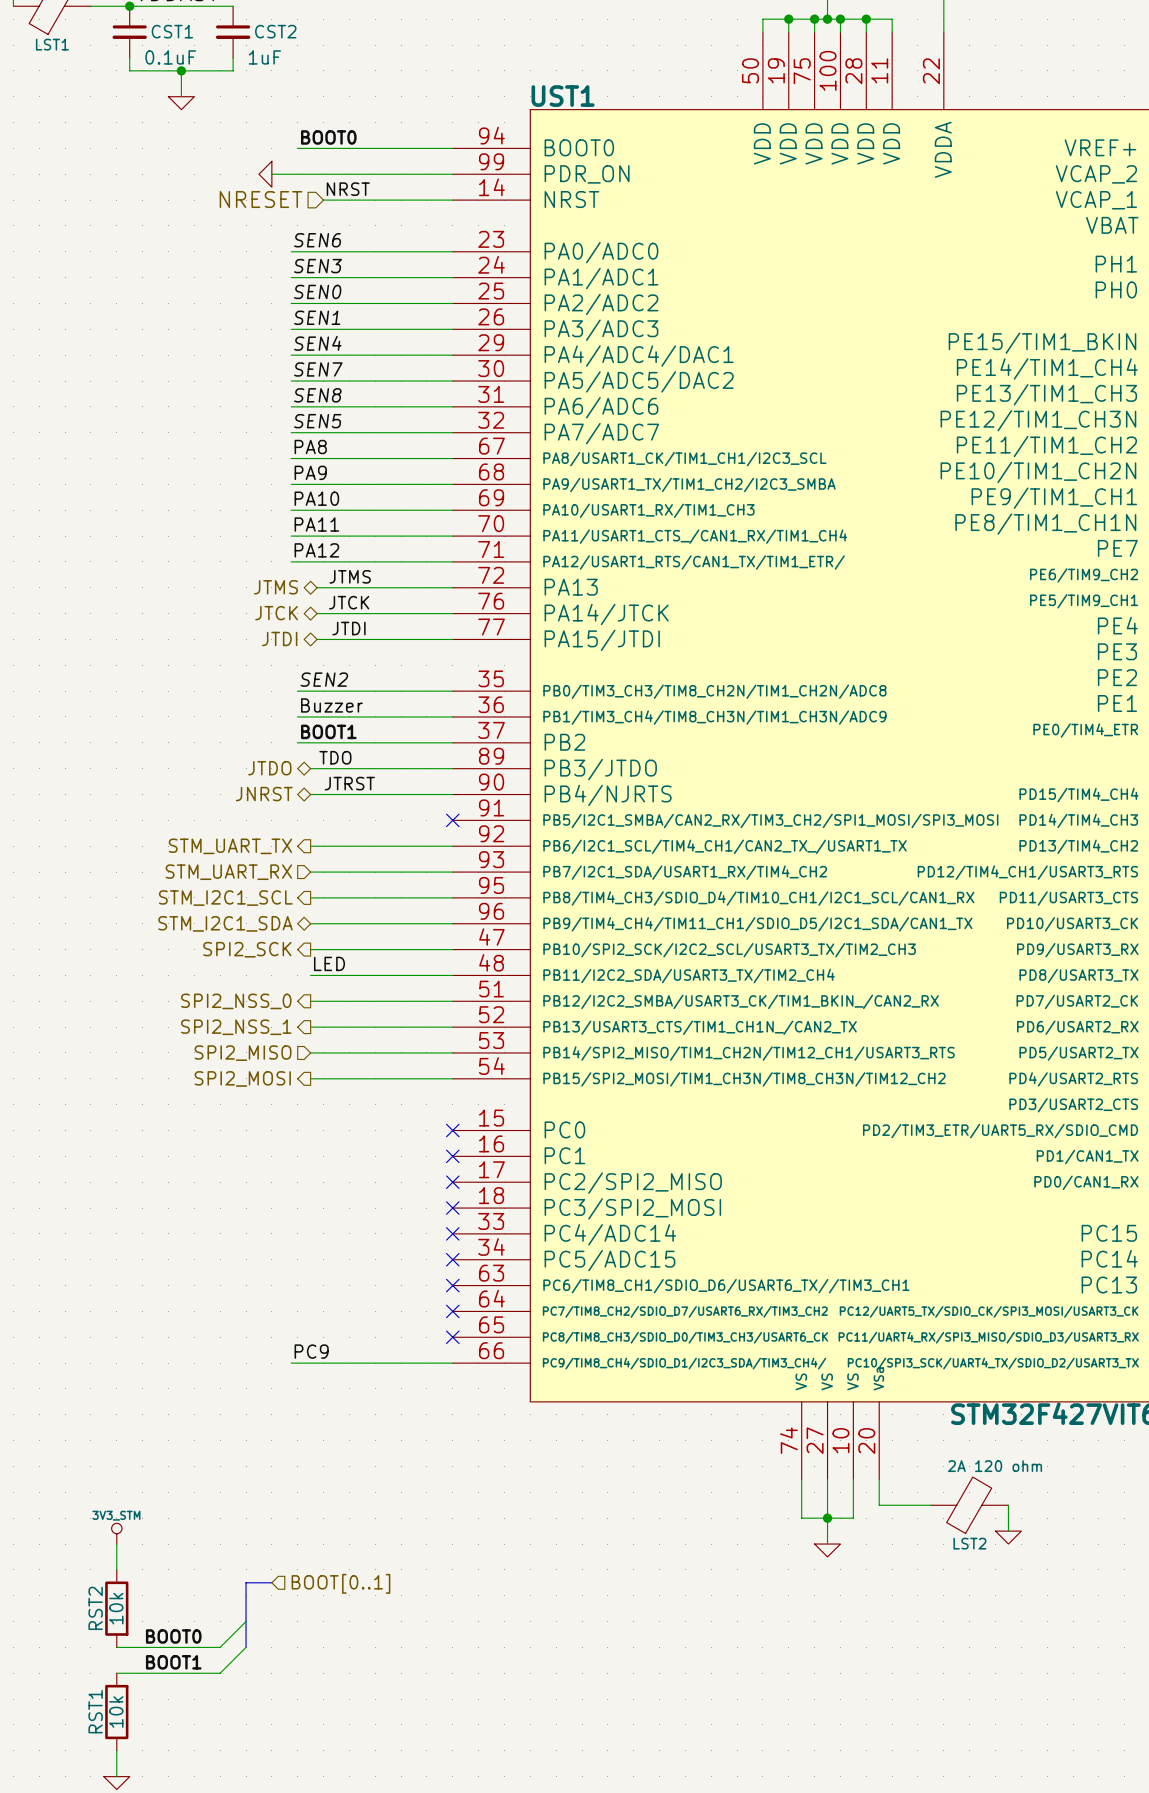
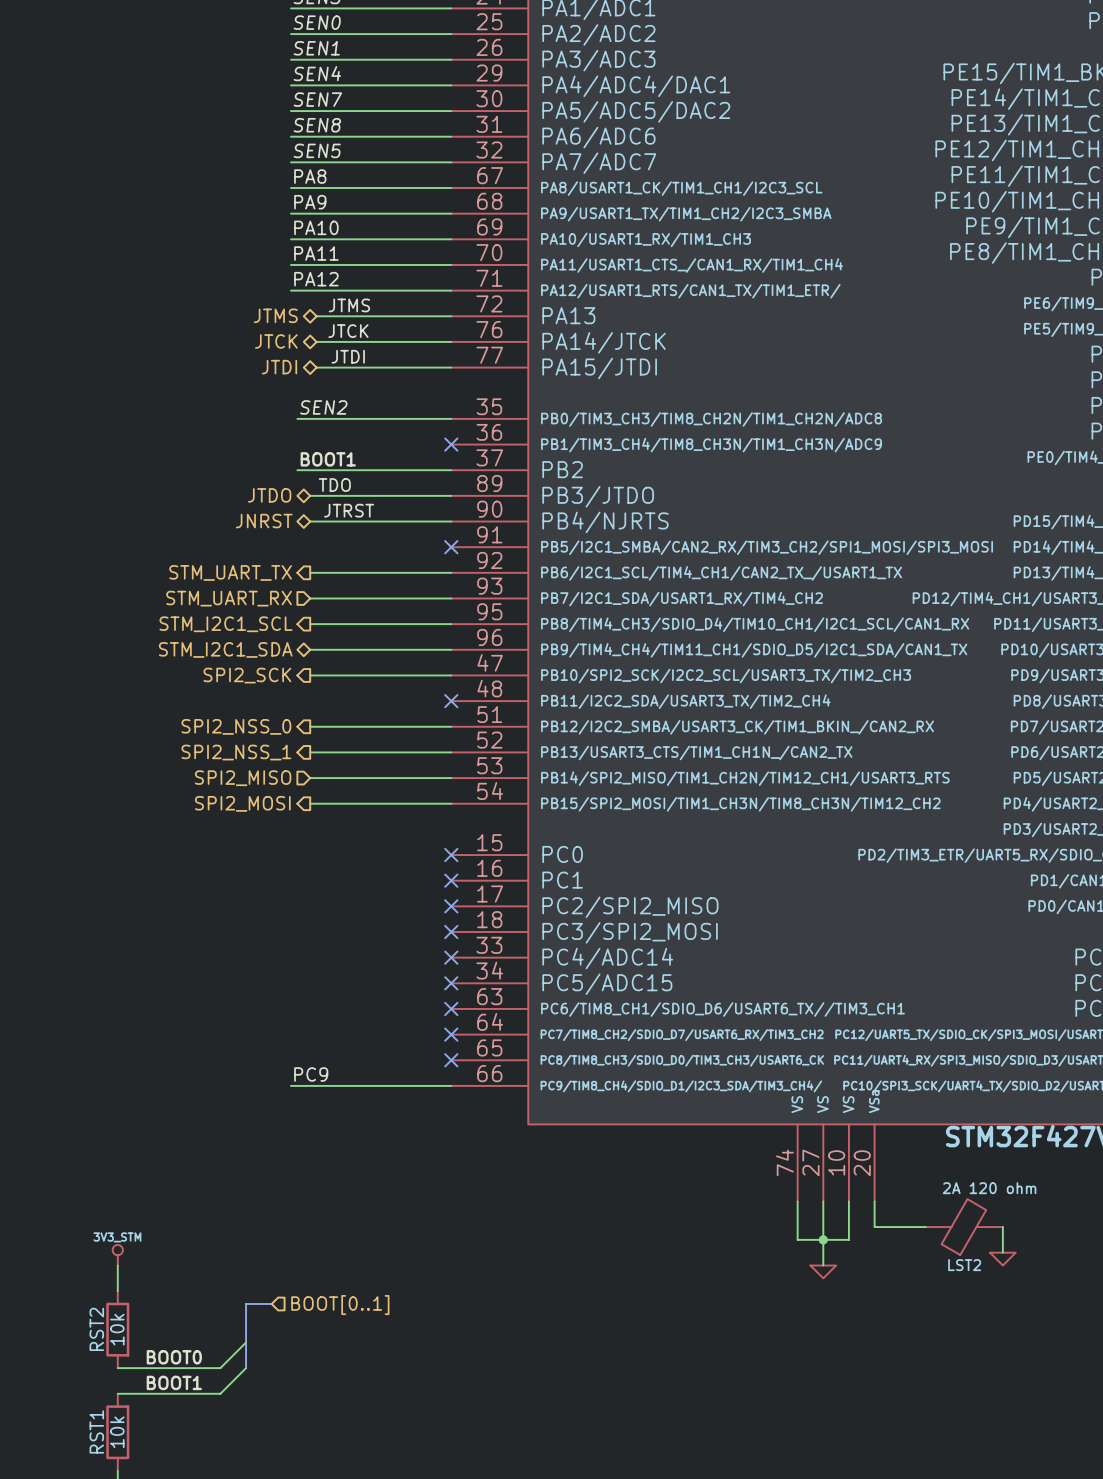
label: Buzzer (331, 705) -> none
wire: (297, 716) (452, 716) -> none
no-connect mark: none -> (451, 444)
label: LED (329, 963) -> none
wire: (310, 975) (452, 975) -> none
no-connect mark: none -> (451, 701)

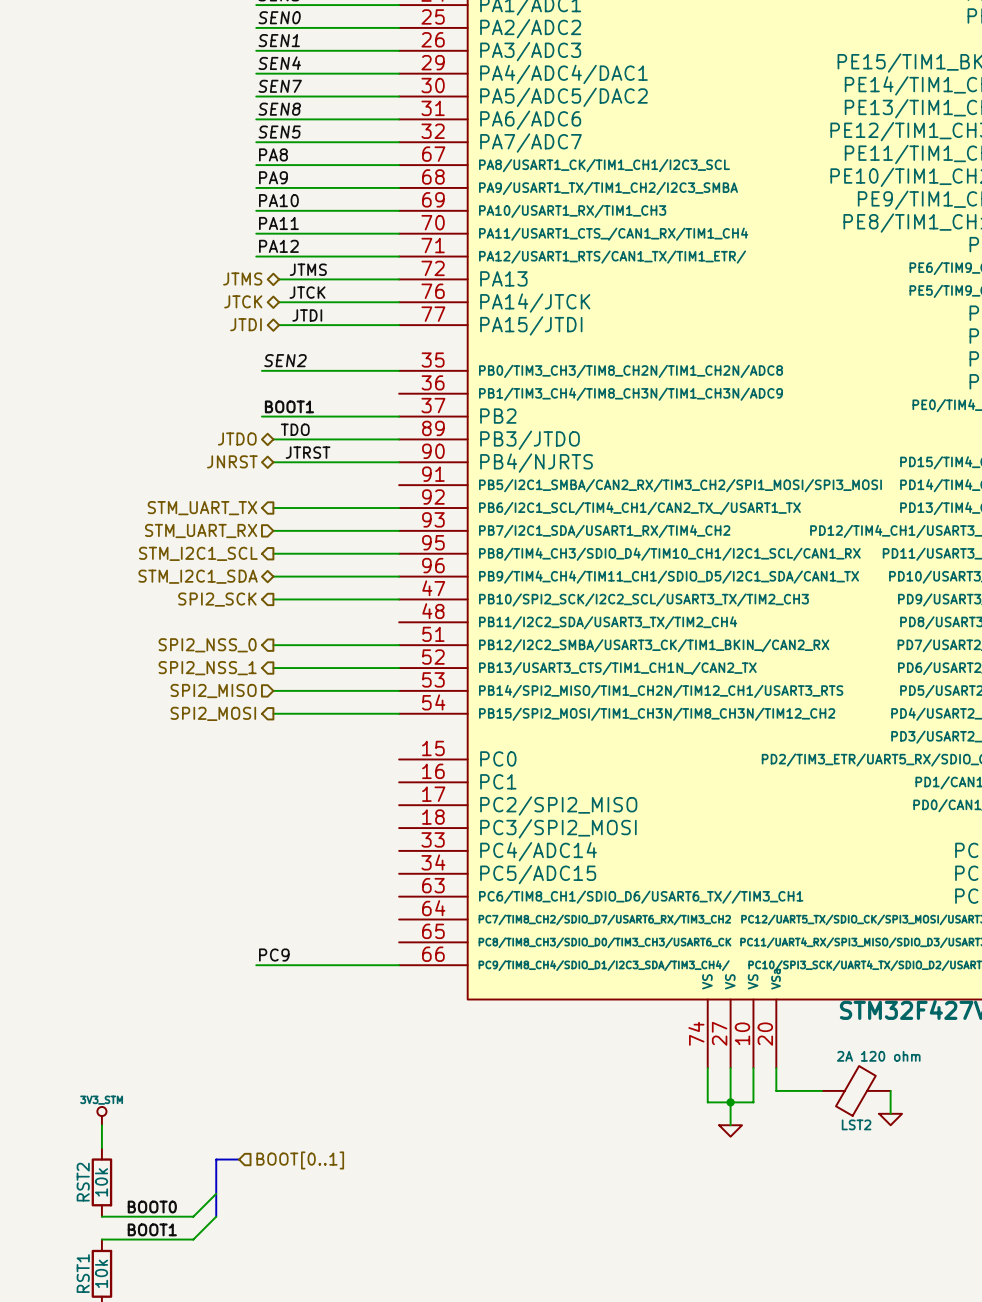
no-connect mark: (451, 444) -> none
no-connect mark: (451, 547) -> none
no-connect mark: (451, 701) -> none
no-connect mark: (451, 855) -> none
no-connect mark: (451, 880) -> none
no-connect mark: (451, 906) -> none
no-connect mark: (451, 932) -> none
no-connect mark: (451, 957) -> none
no-connect mark: (451, 983) -> none
no-connect mark: (451, 1008) -> none
no-connect mark: (451, 1034) -> none
no-connect mark: (451, 1060) -> none

